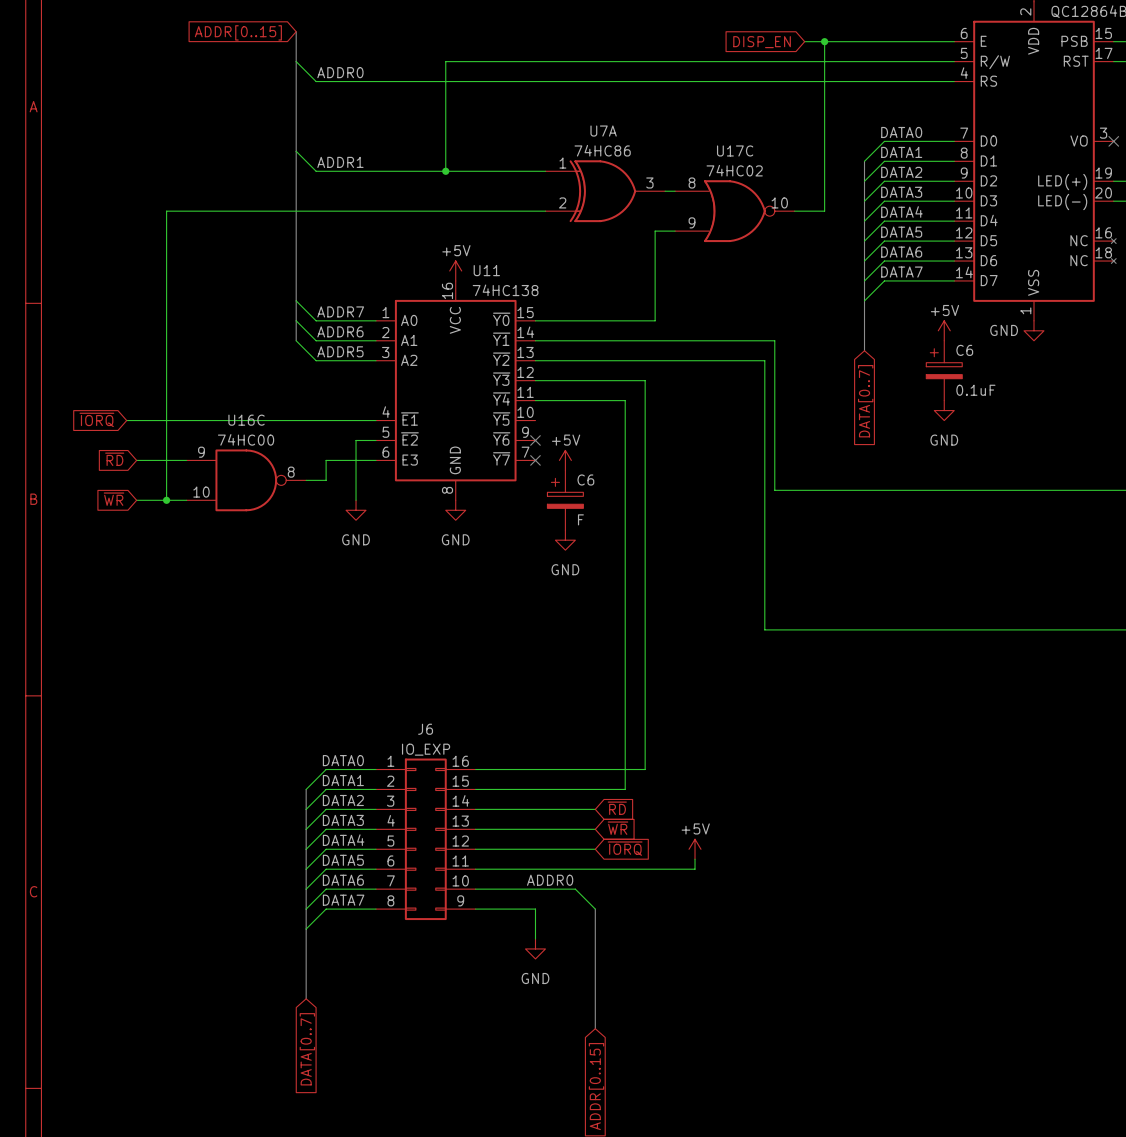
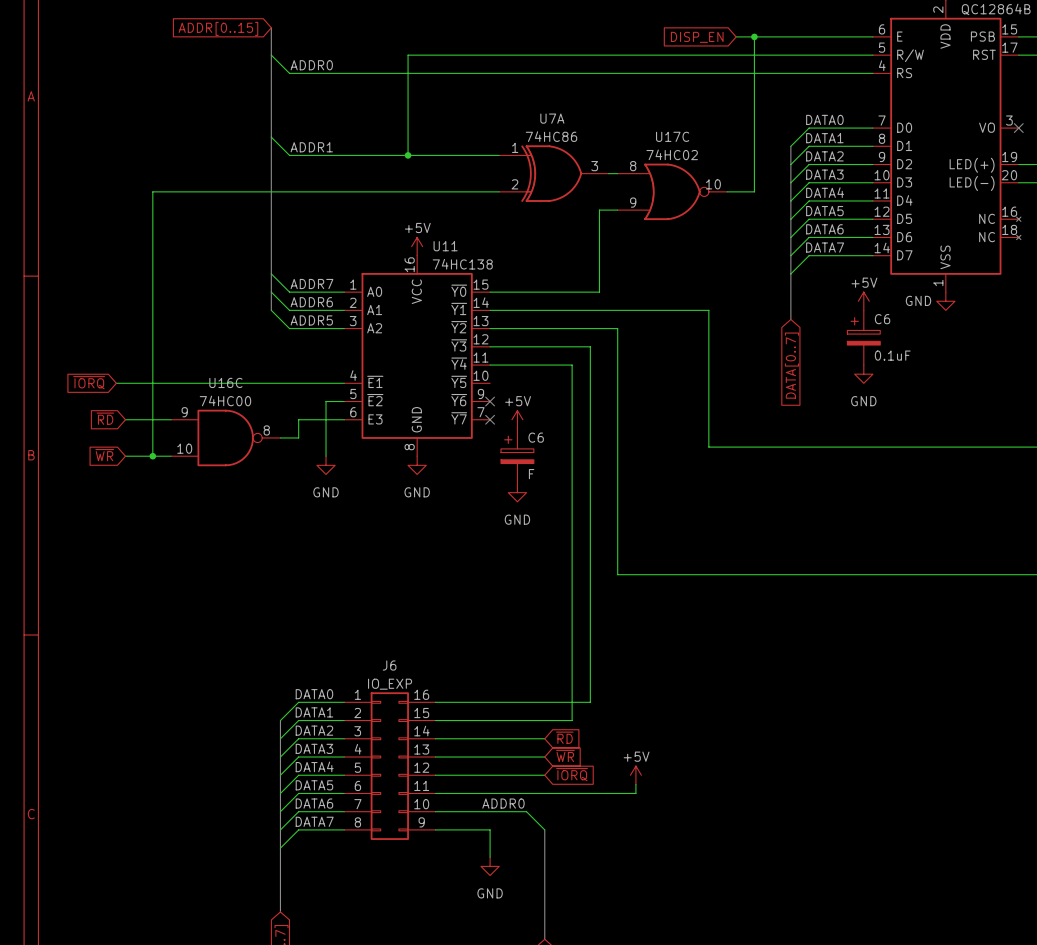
wire: (675, 360) (764, 360) (764, 629) -> (617, 328) (617, 574) (699, 574)

